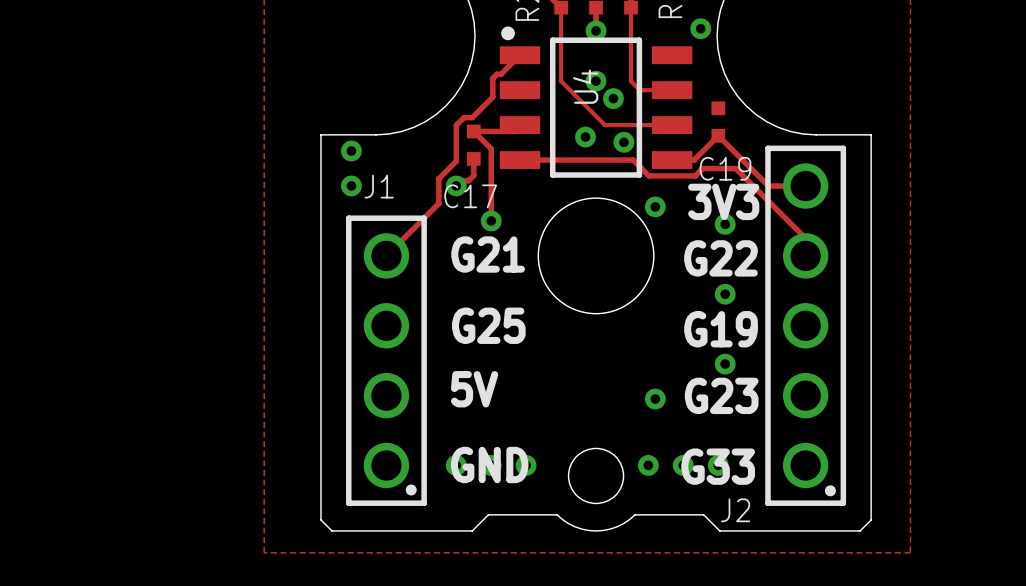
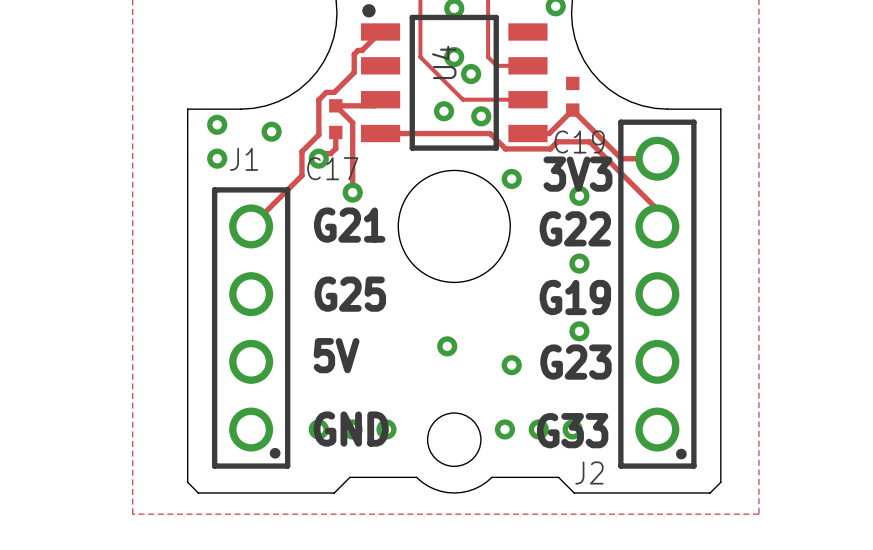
via: none -> (271, 131)
via: none -> (447, 346)

